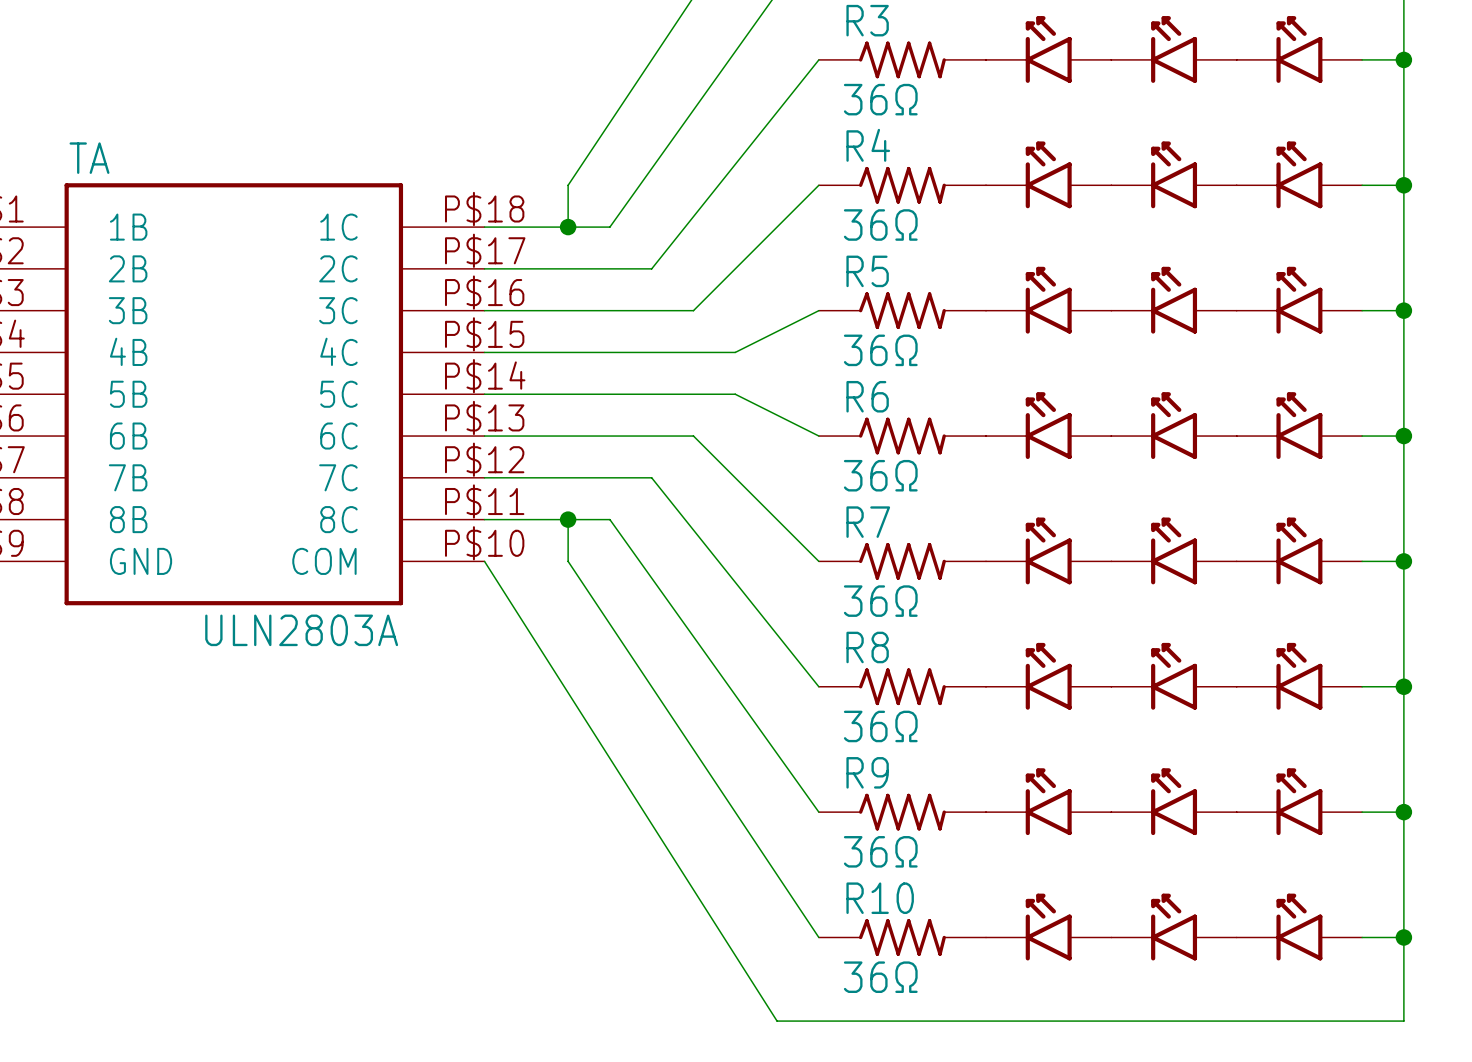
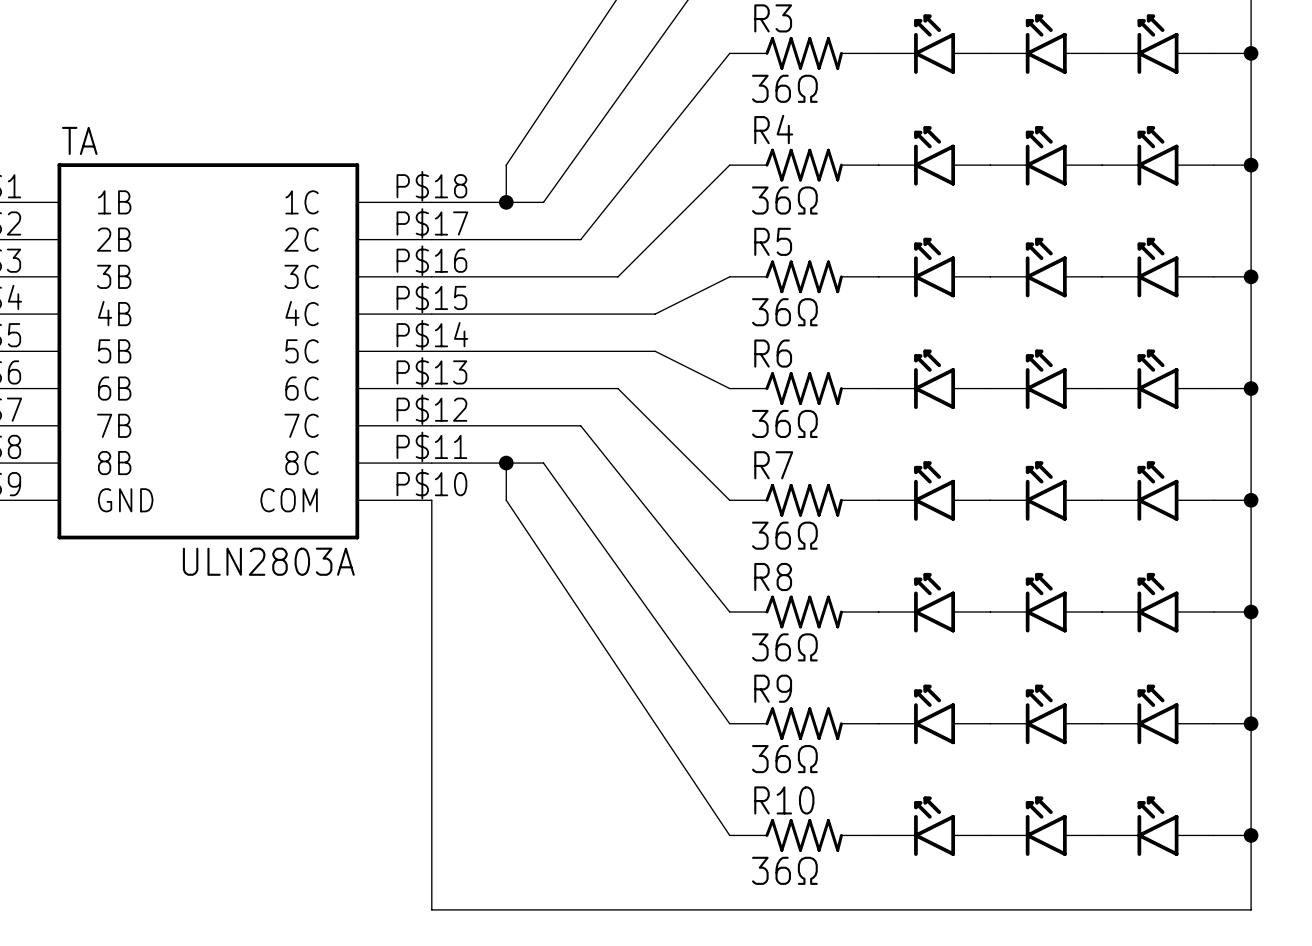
wire: (484, 561) (777, 1021) -> (431, 500) (431, 909) (692, 909)

